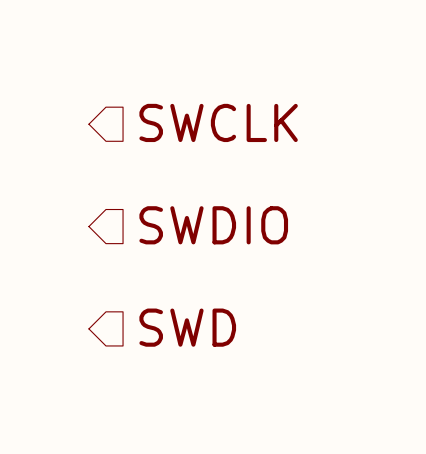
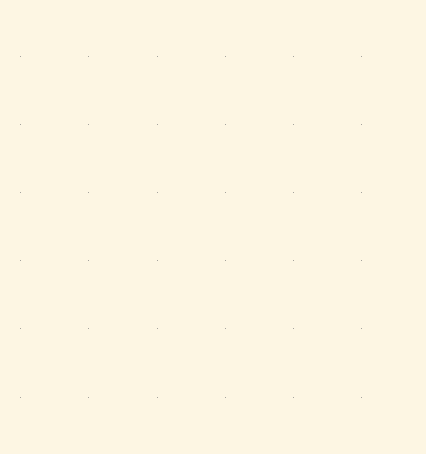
hierarchical label: SWCLK (218, 122) -> none
hierarchical label: SWDIO (213, 225) -> none
hierarchical label: SWD (187, 327) -> none

